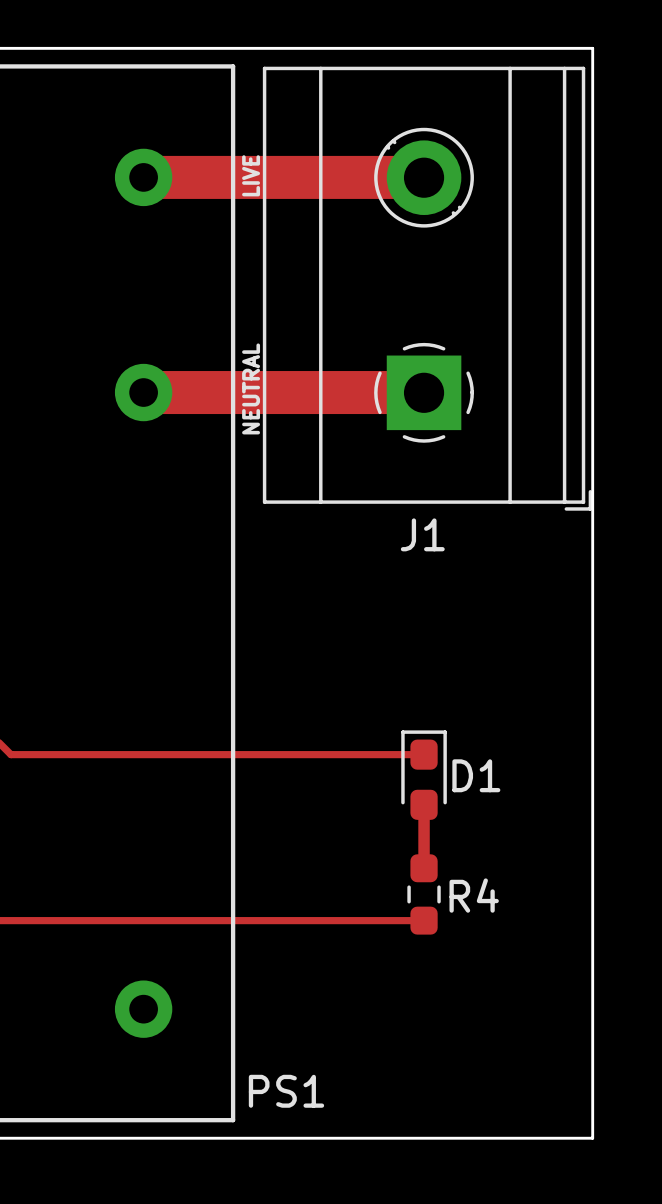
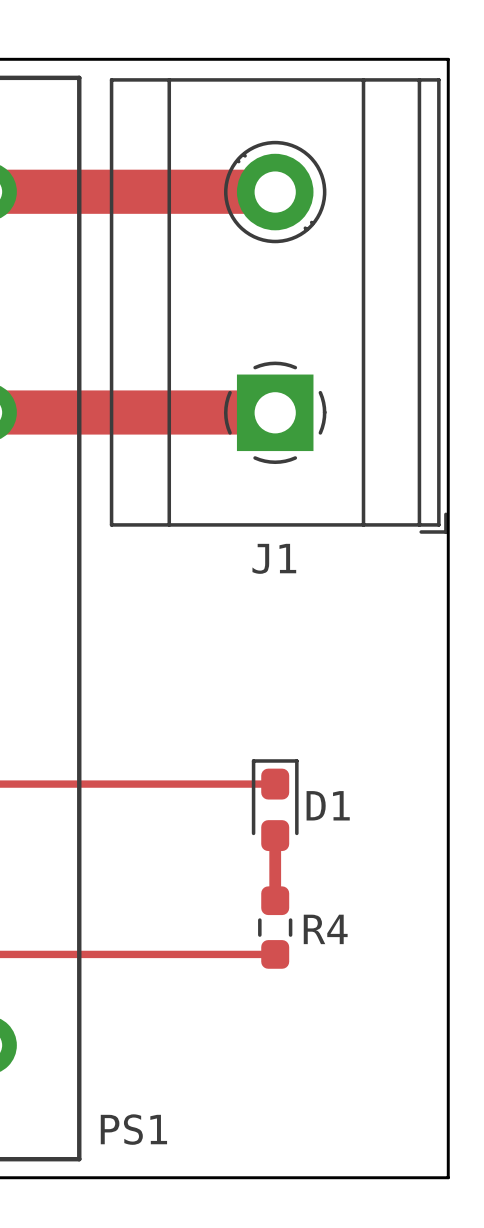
text: LIVE (251, 175) -> none
text: NEUTRAL (251, 388) -> none

